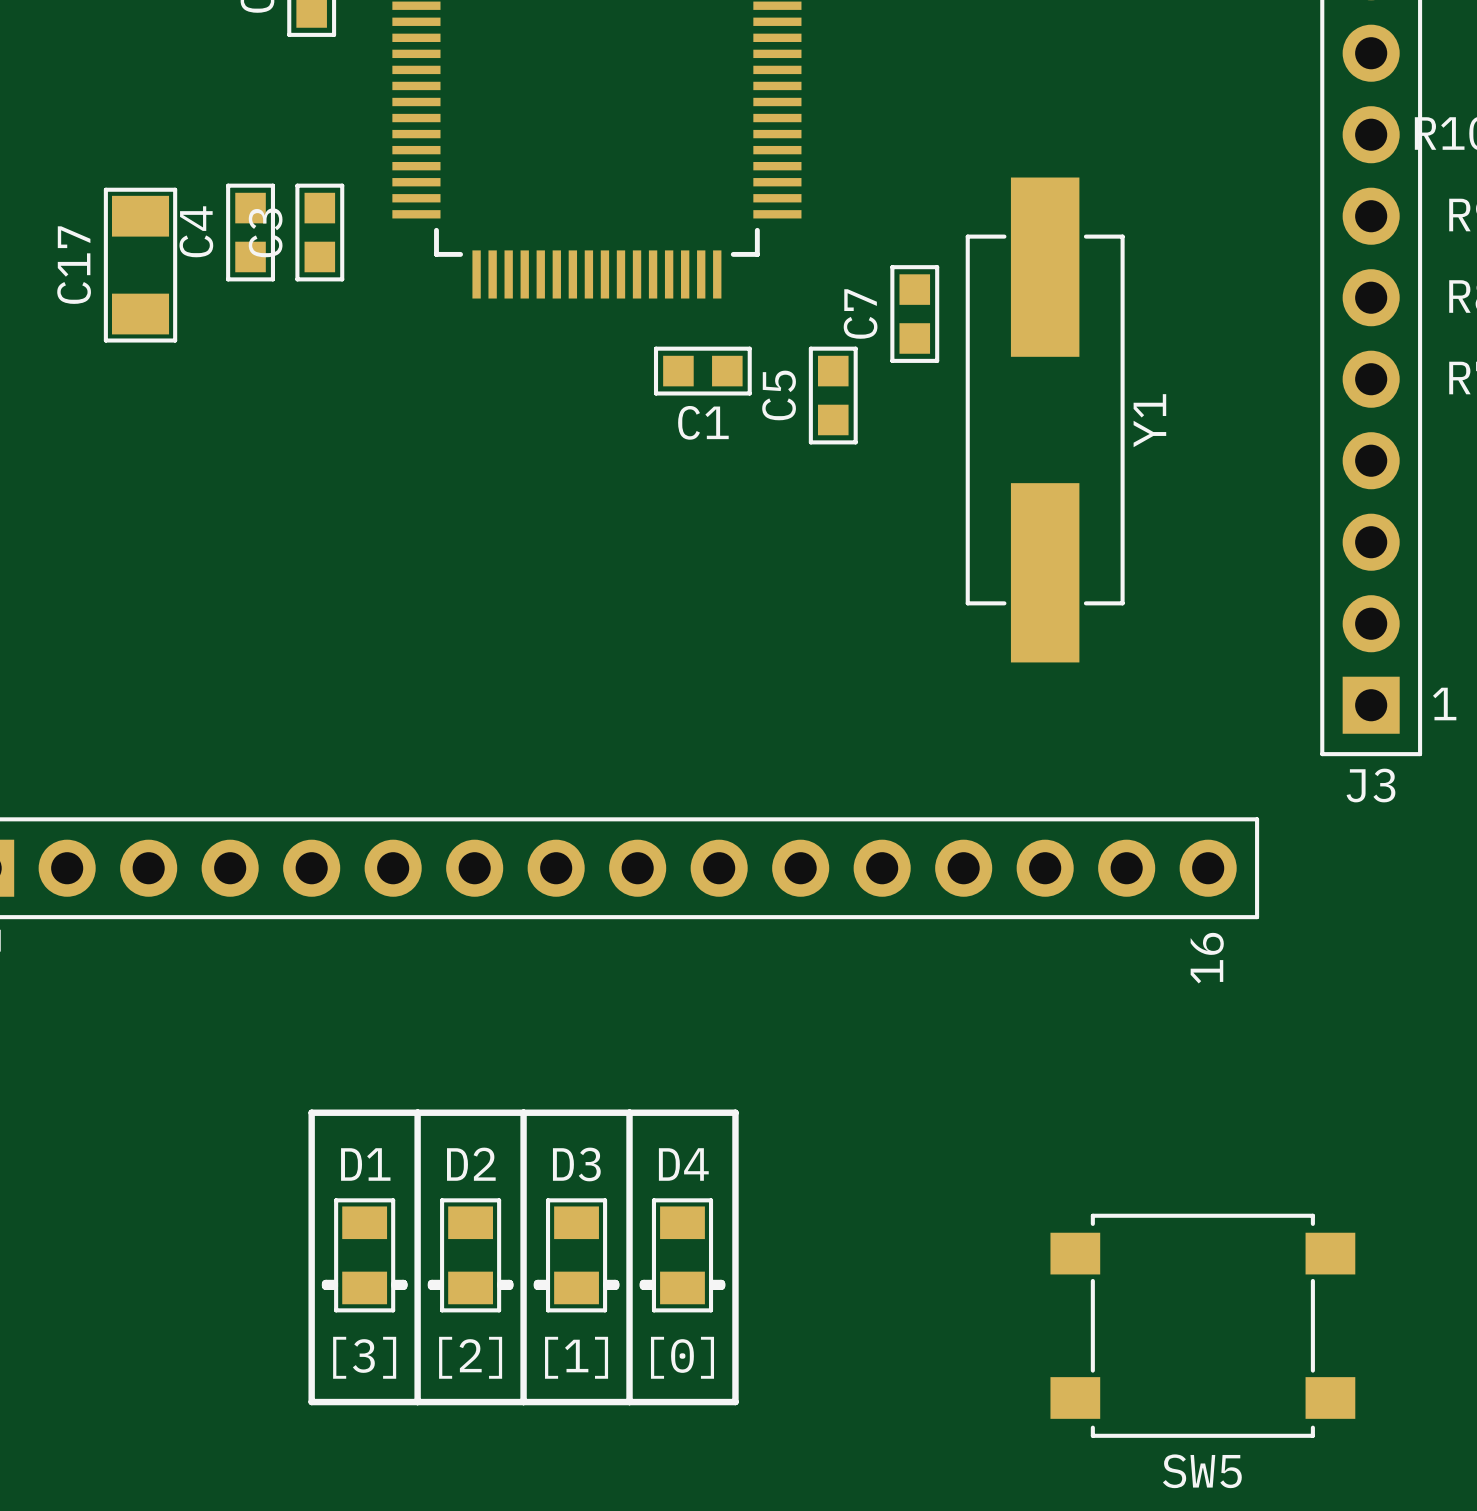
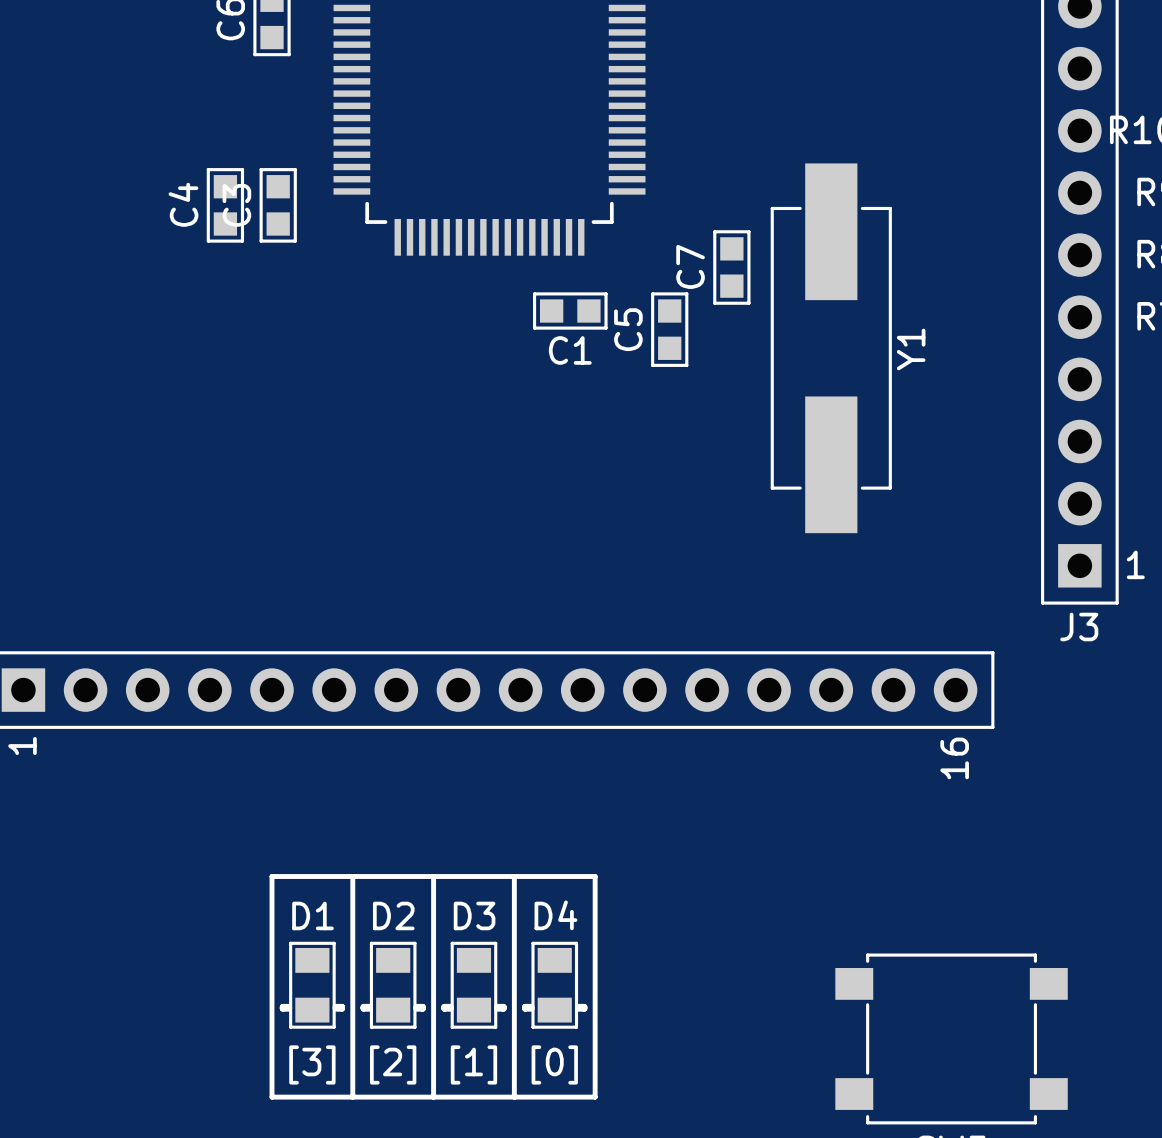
C17: (140, 265) -> none

